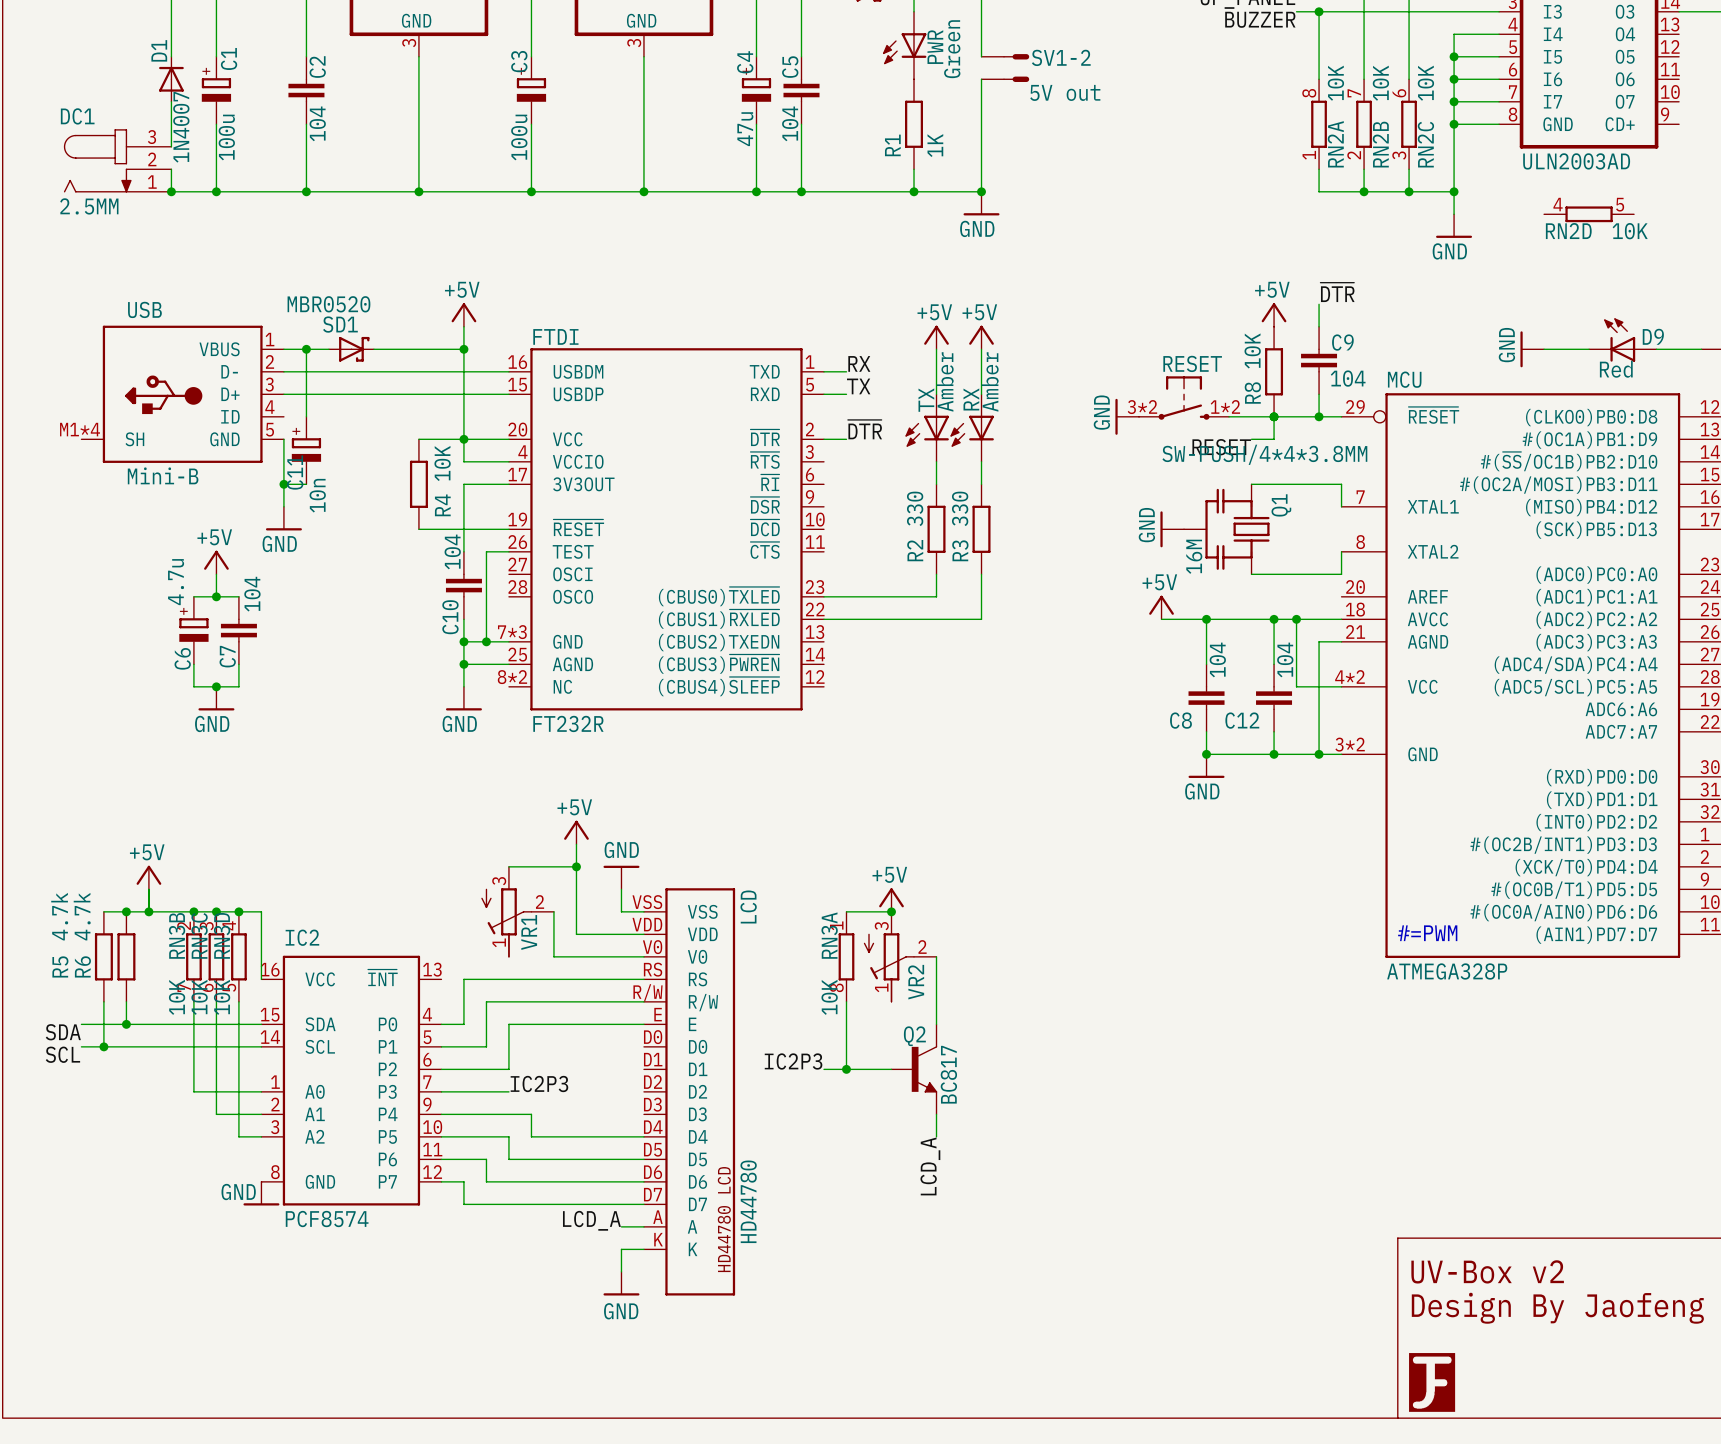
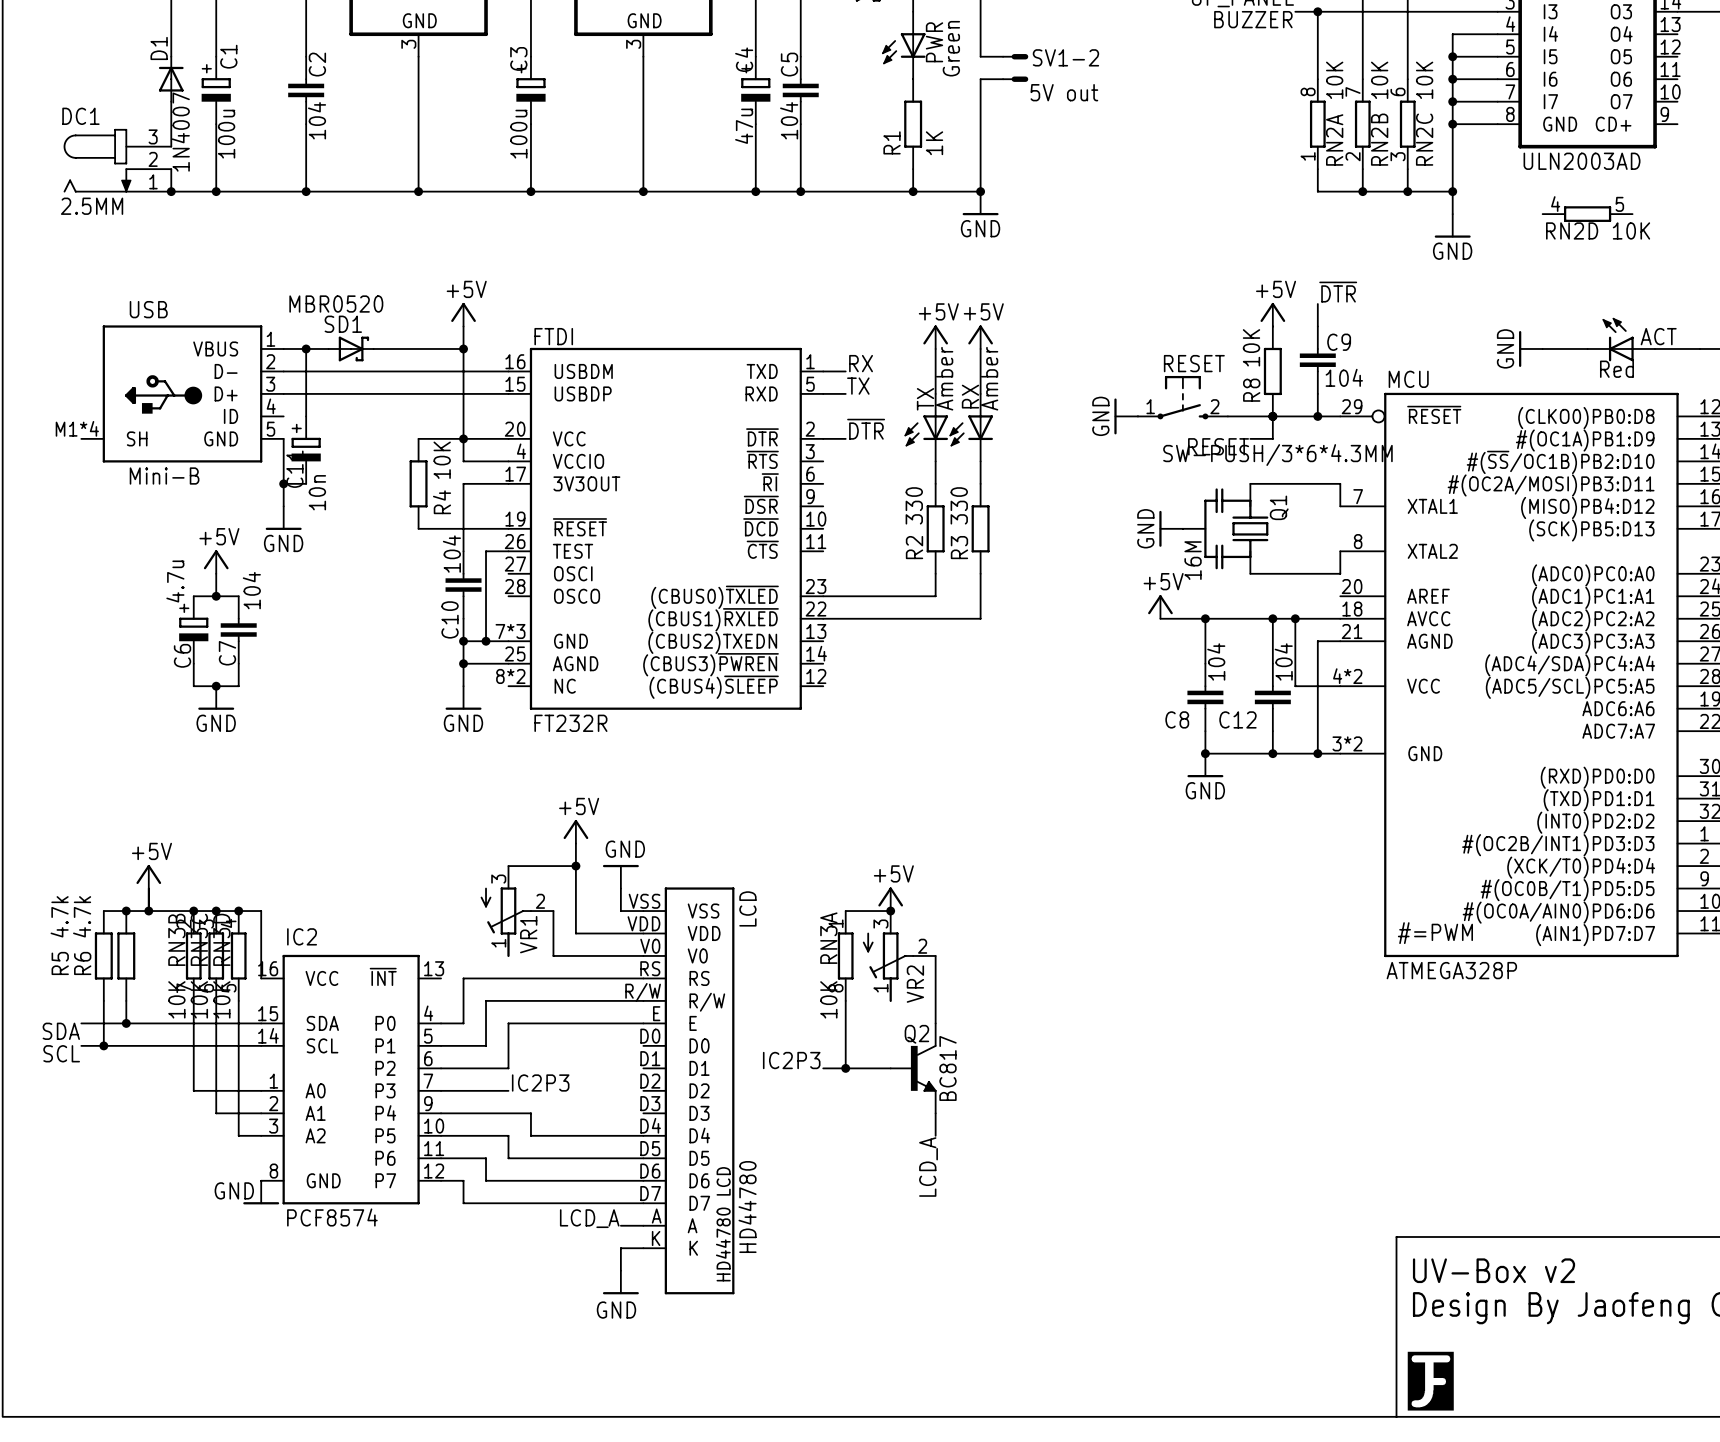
D9 name: D9 (1653, 336) -> ACT (1658, 336)
RESET pin number: 1*2 (1225, 406) -> 2 (1214, 406)
RESET pin number: 3*2 (1142, 407) -> 1 (1150, 406)
RESET value: SW-PUSH/4*4*3.8MM (1264, 454) -> SW-PUSH/3*6*4.3MM (1277, 455)

